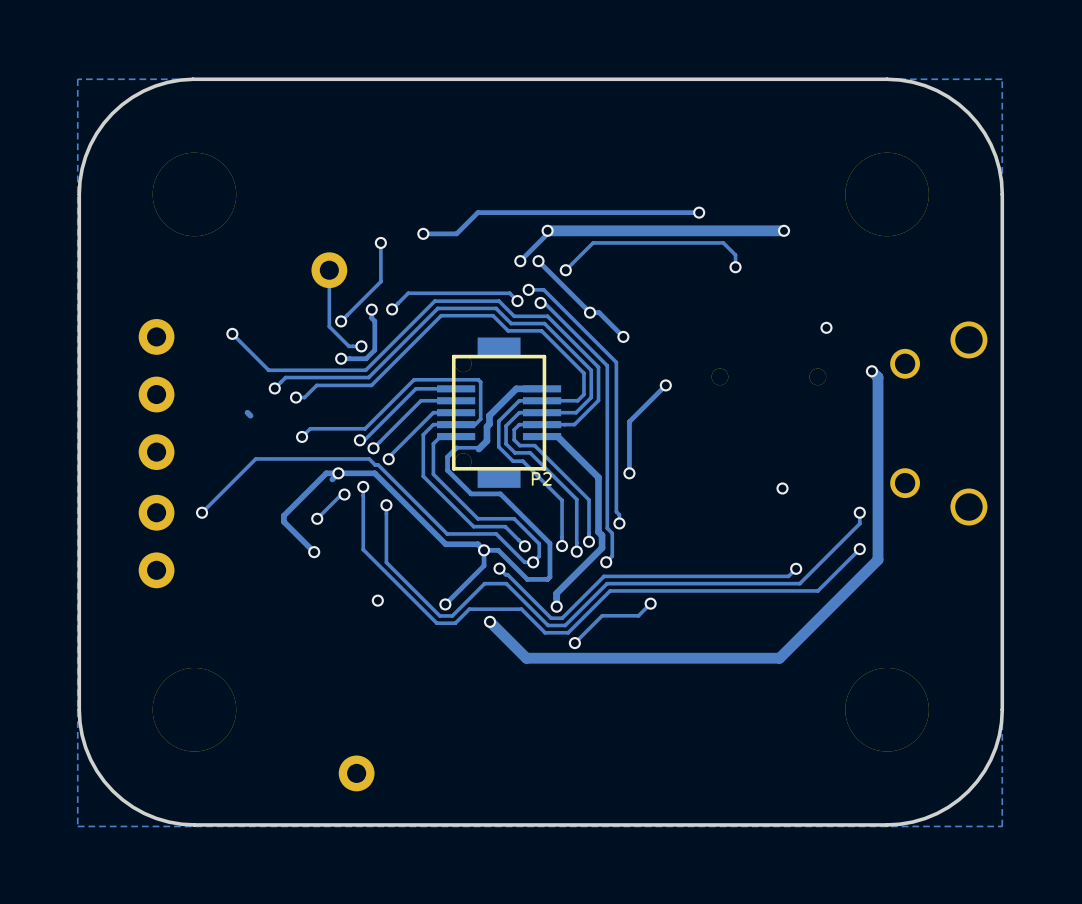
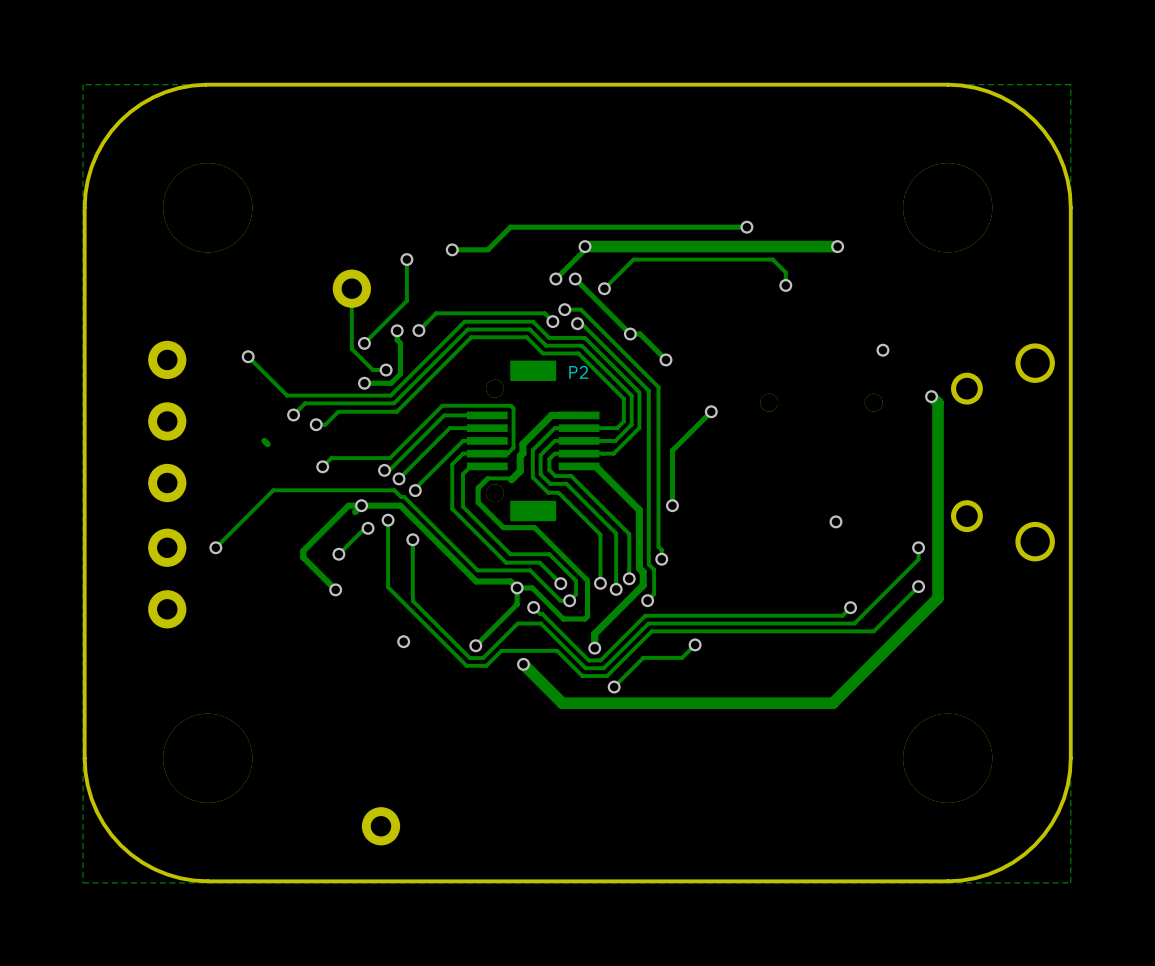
P2 footprint: [437, 337, 562, 488] -> [466, 360, 600, 522]
P2 name position: P2 (541, 478) -> P2 (578, 372)

